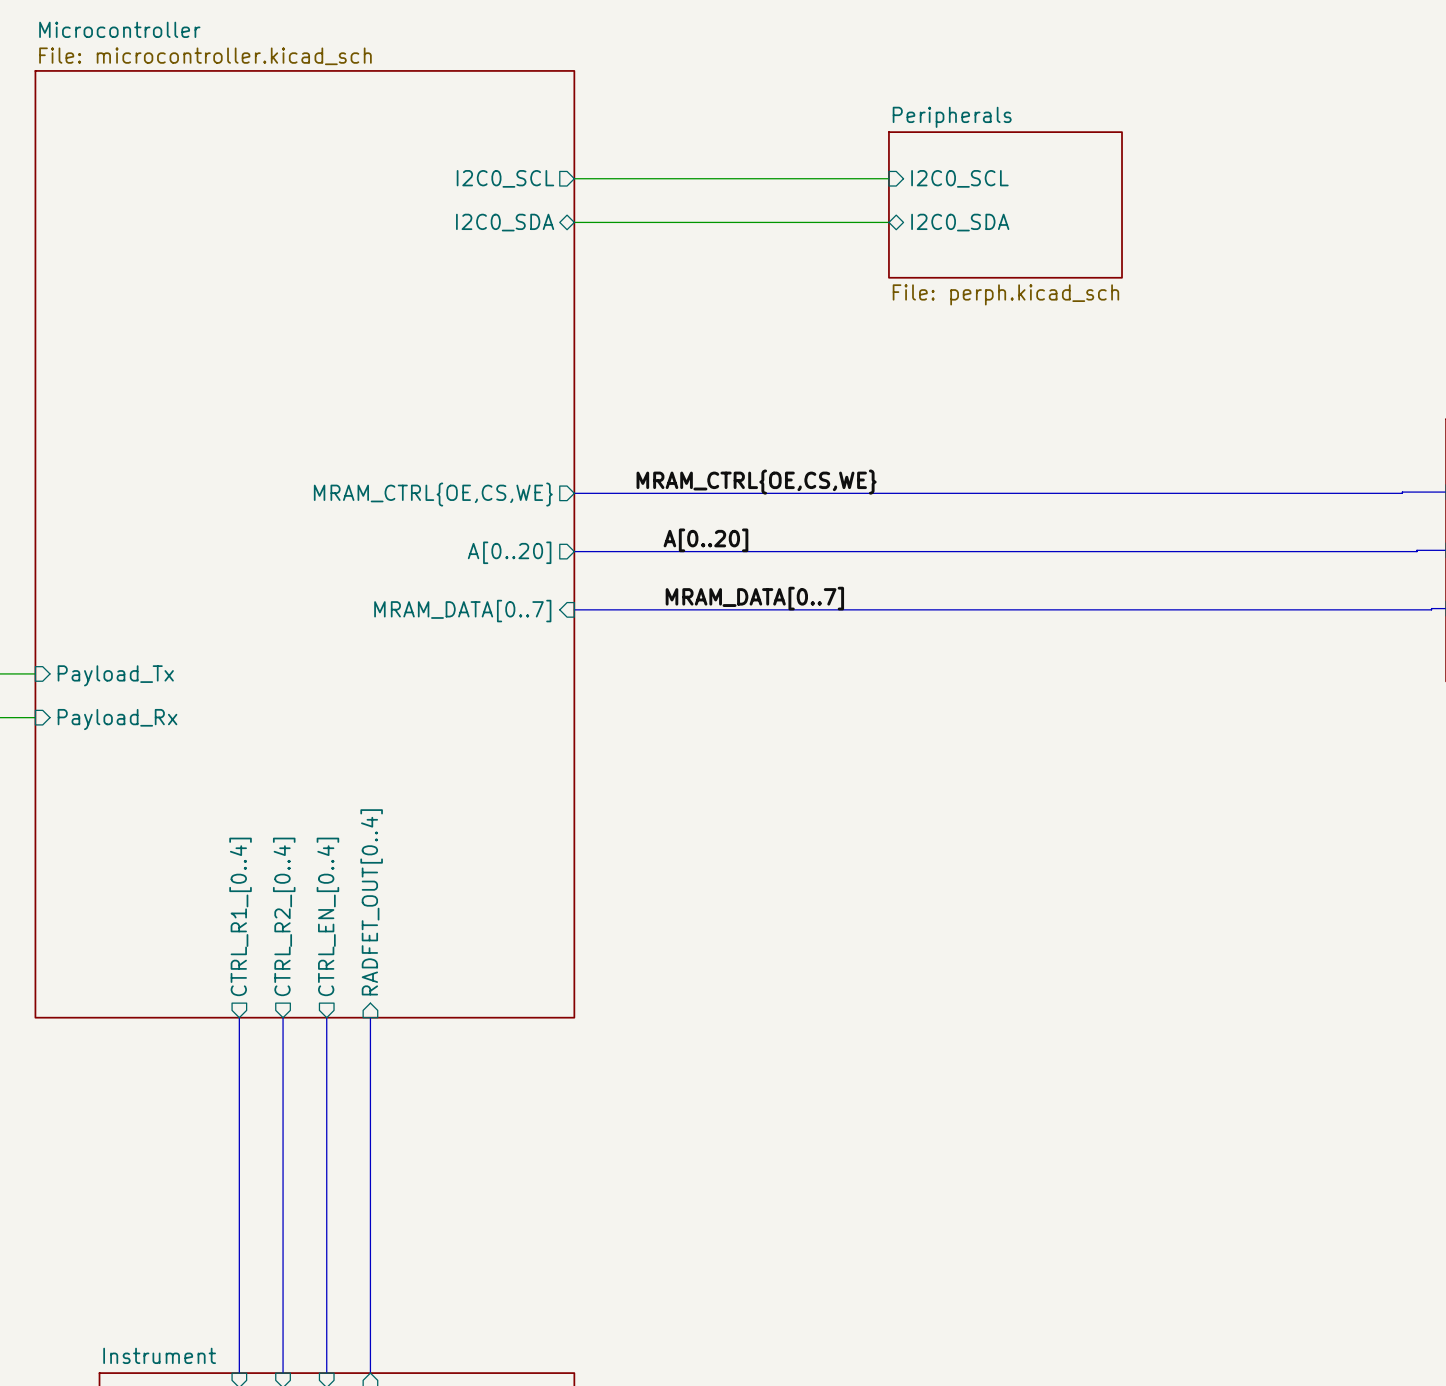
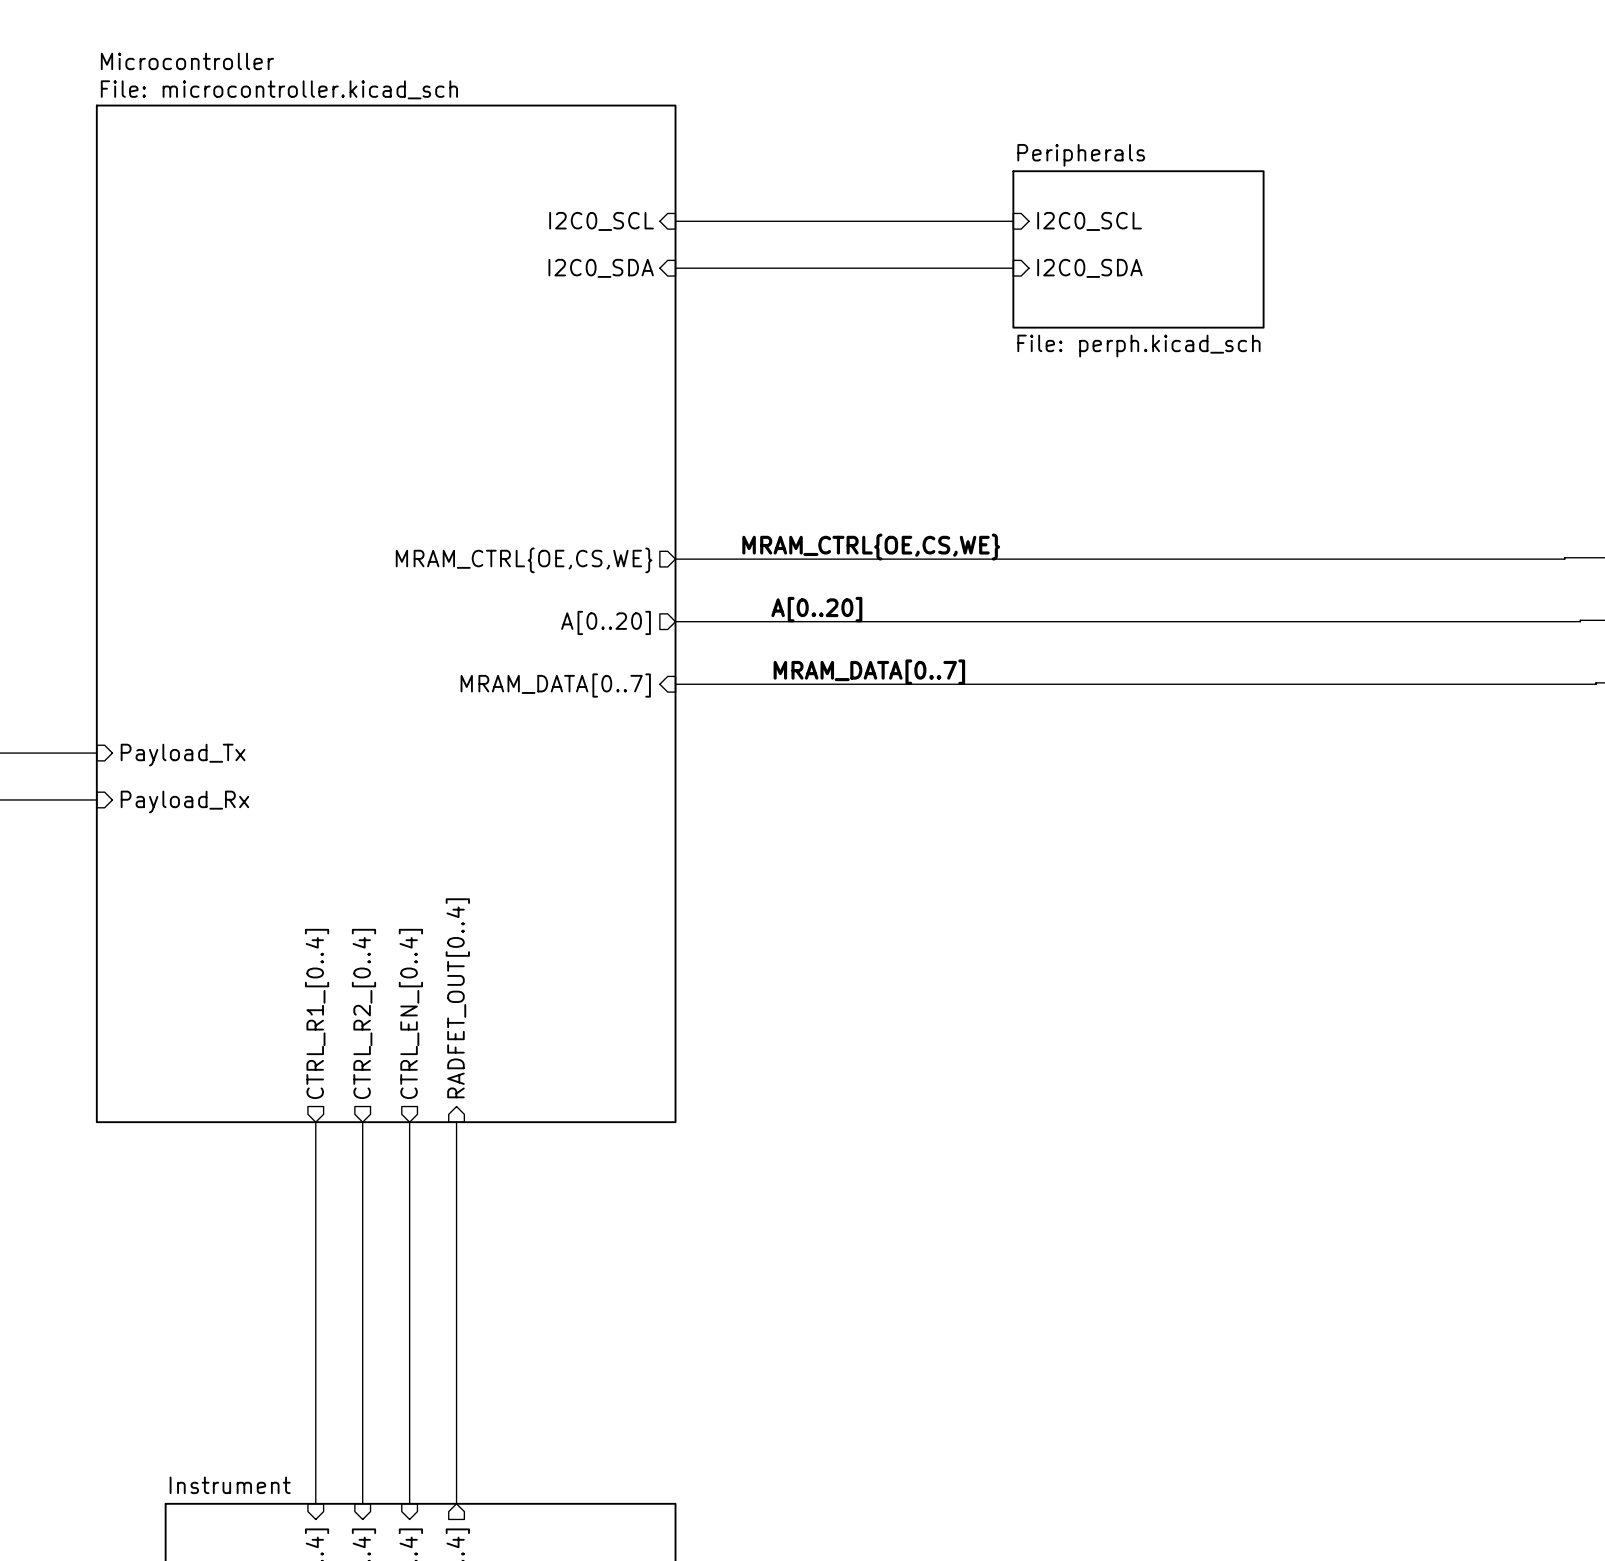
sheet pin shape: output (505, 178) -> input (601, 221)
sheet pin shape: bidirectional (505, 222) -> input (601, 268)
sheet pin shape: bidirectional (960, 222) -> input (1089, 268)

